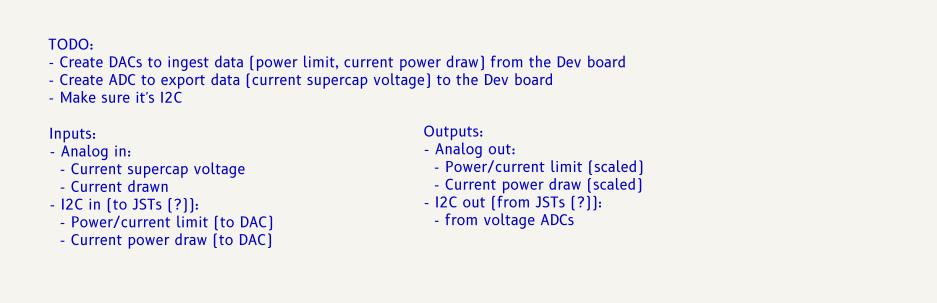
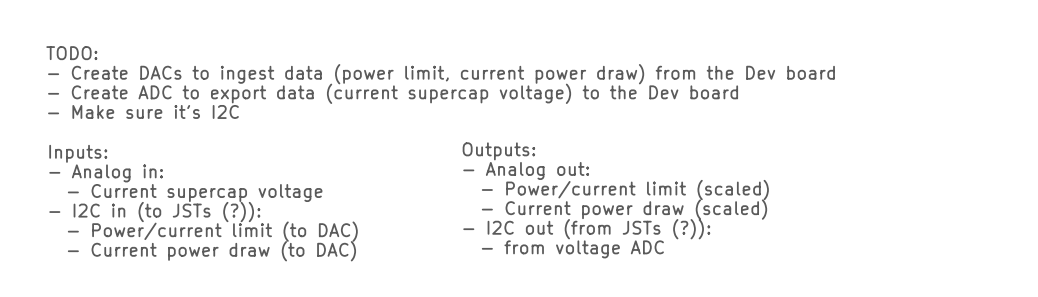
text: - Current drawn (114, 186) -> - I2C in (to JSTs (?)): (154, 212)
text: - I2C in (to JSTs (?)): (124, 205) -> - Power/current limit (to DAC) (212, 231)
text: - from voltage ADCs (504, 221) -> - from voltage ADC (572, 249)
text: - Power/current limit (to DAC) (166, 222) -> - Current power draw (to DAC) (211, 251)
text: - Current power draw (to DAC) (165, 240) -> none

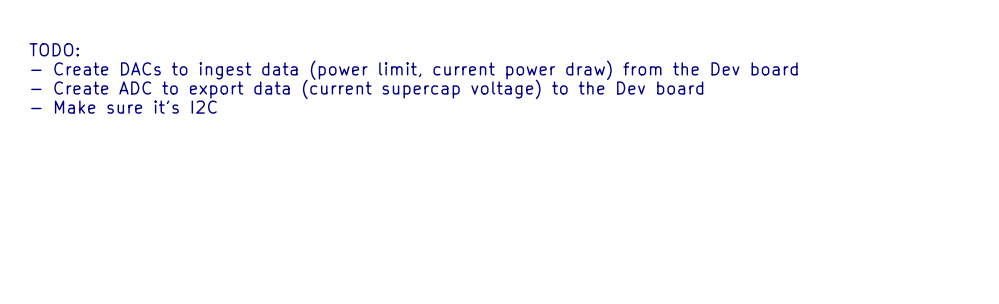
text: Outputs: (498, 151) -> none
text: Inputs: (78, 153) -> none
text: - Analog out: (526, 170) -> none
text: - Analog in: (106, 173) -> none
text: - Power/current limit (scaled) (625, 189) -> none
text: - Current supercap voltage (195, 193) -> none
text: - Current power draw (scaled) (624, 209) -> none
text: - I2C in (to JSTs (?)): (154, 212) -> none
text: - I2C out (from JSTs (?)): (586, 229) -> none
text: - Power/current limit (to DAC) (212, 231) -> none
text: - from voltage ADC (572, 249) -> none
text: - Current power draw (to DAC) (211, 251) -> none

